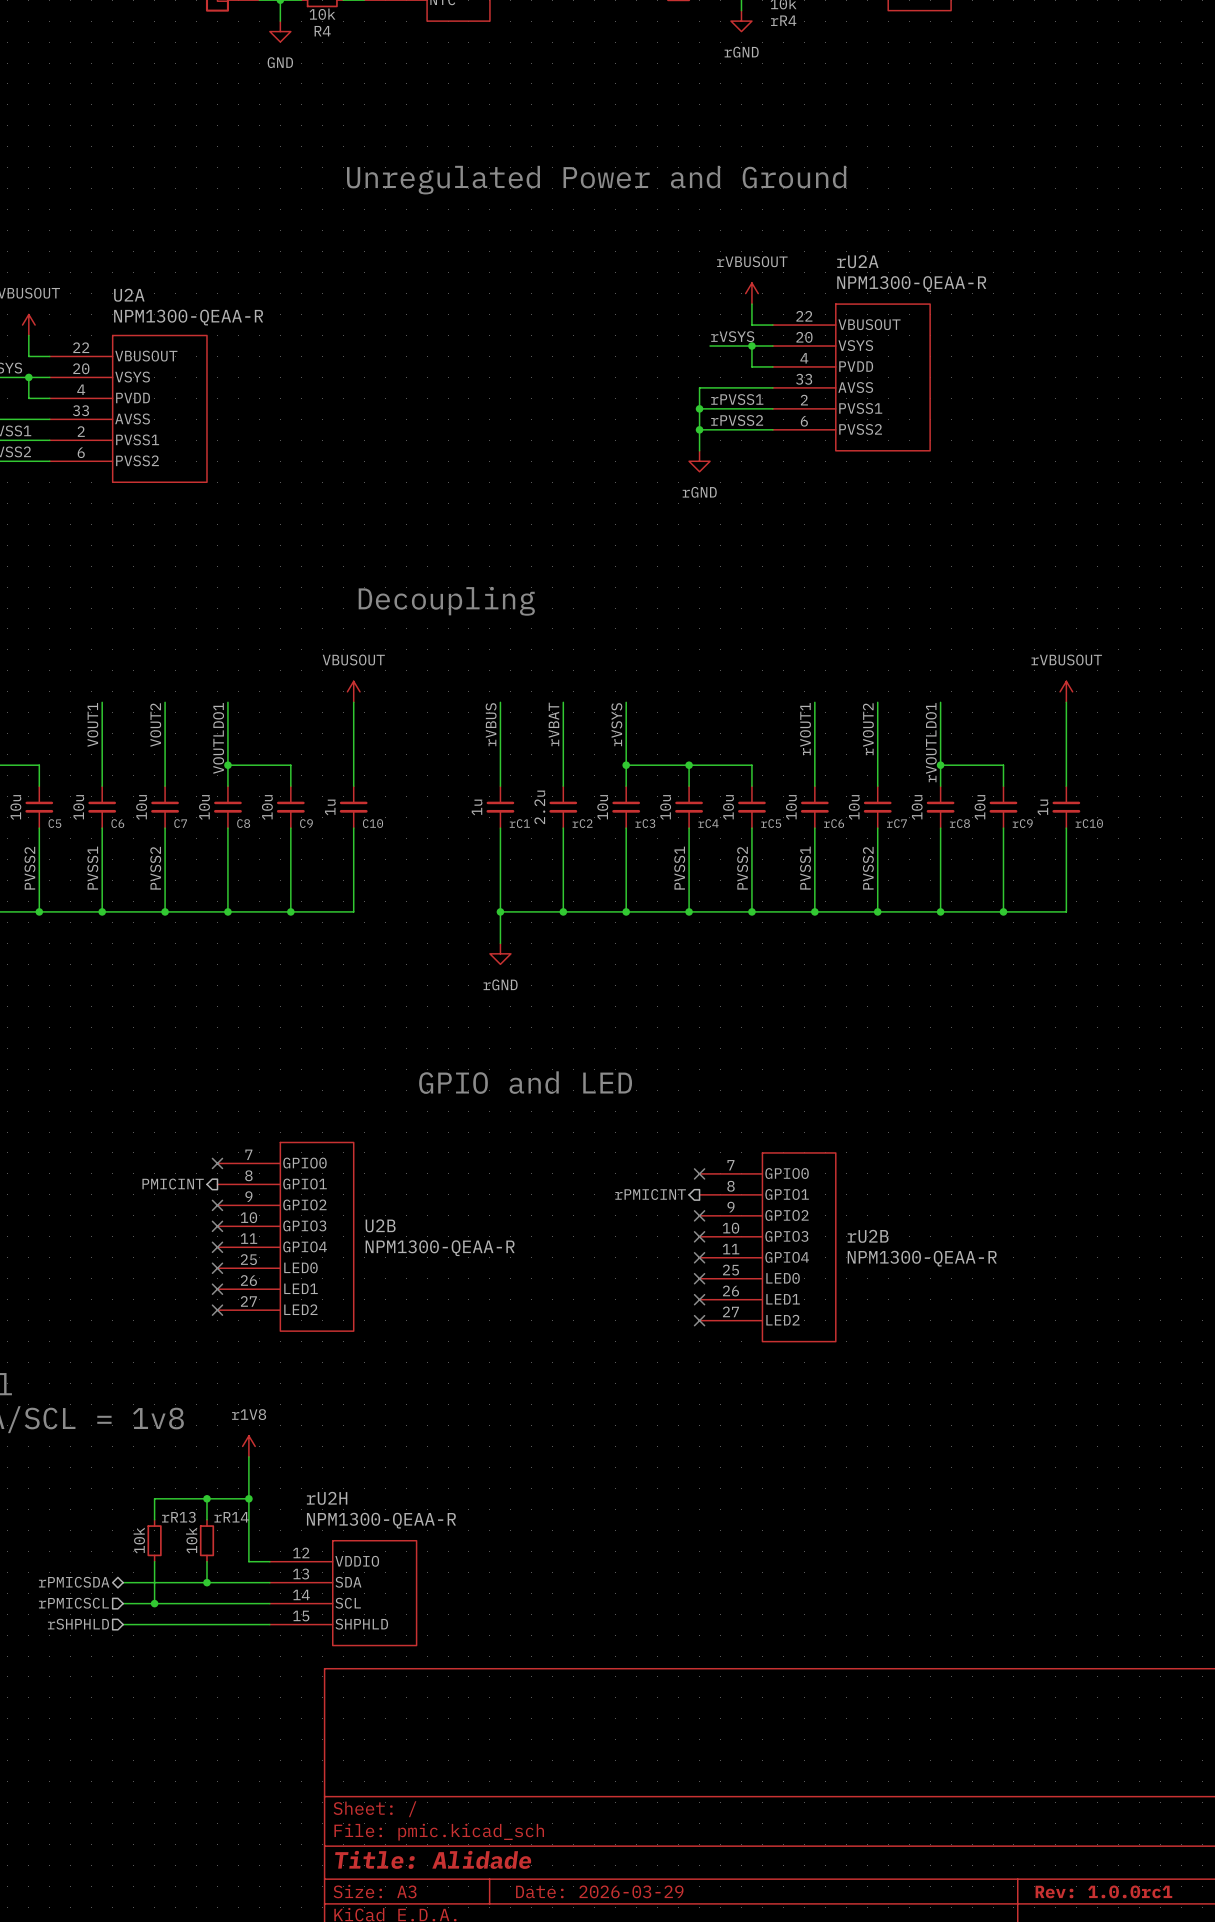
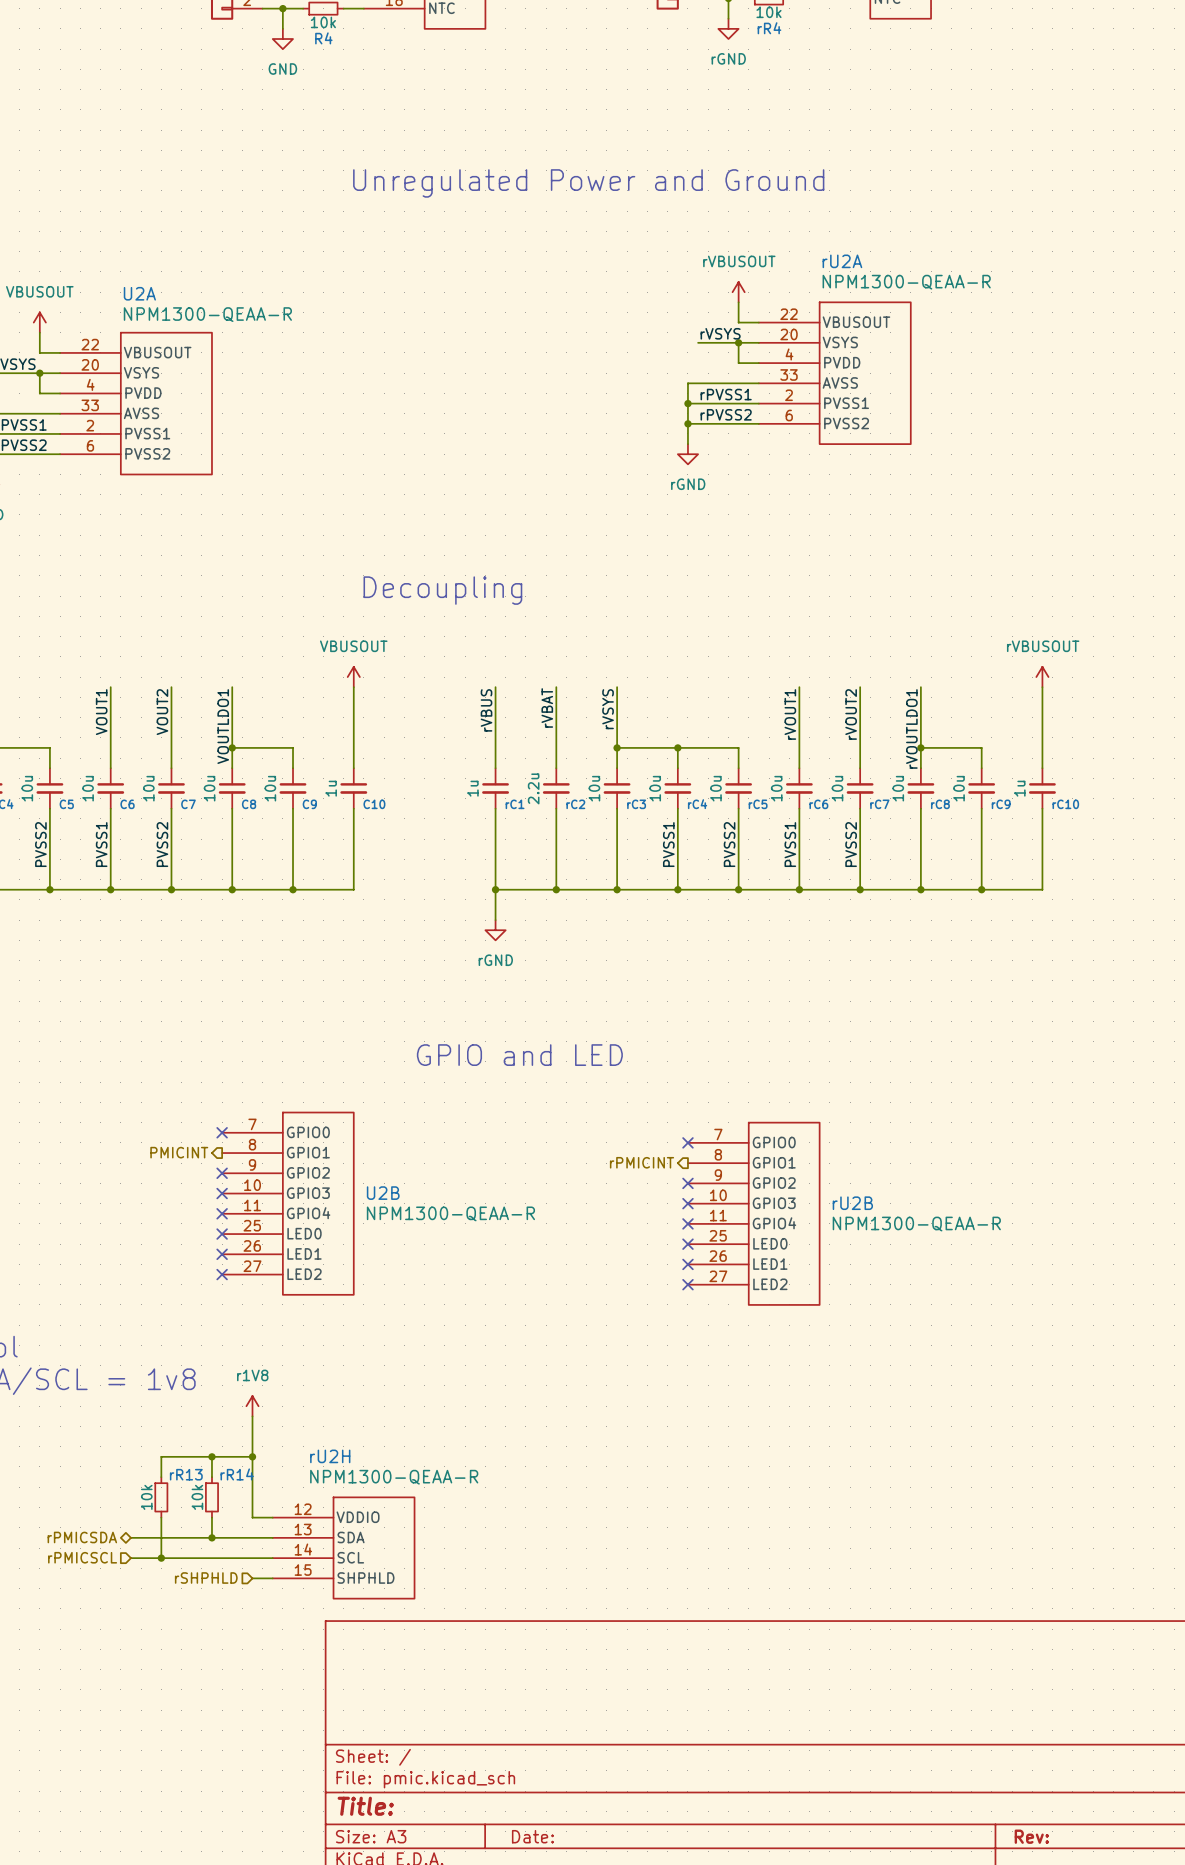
hierarchical label position: rSHPHLD (78, 1624) -> rSHPHLD (206, 1578)
wire: (123, 1624) (248, 1624) -> none
title block: Title: Alidade (433, 1859) -> Title: (365, 1806)
title block: Date: 2026-03-29 (599, 1891) -> Date: (532, 1836)
title block: Rev: 1.0.0rc1 (1103, 1891) -> Rev: (1031, 1836)

